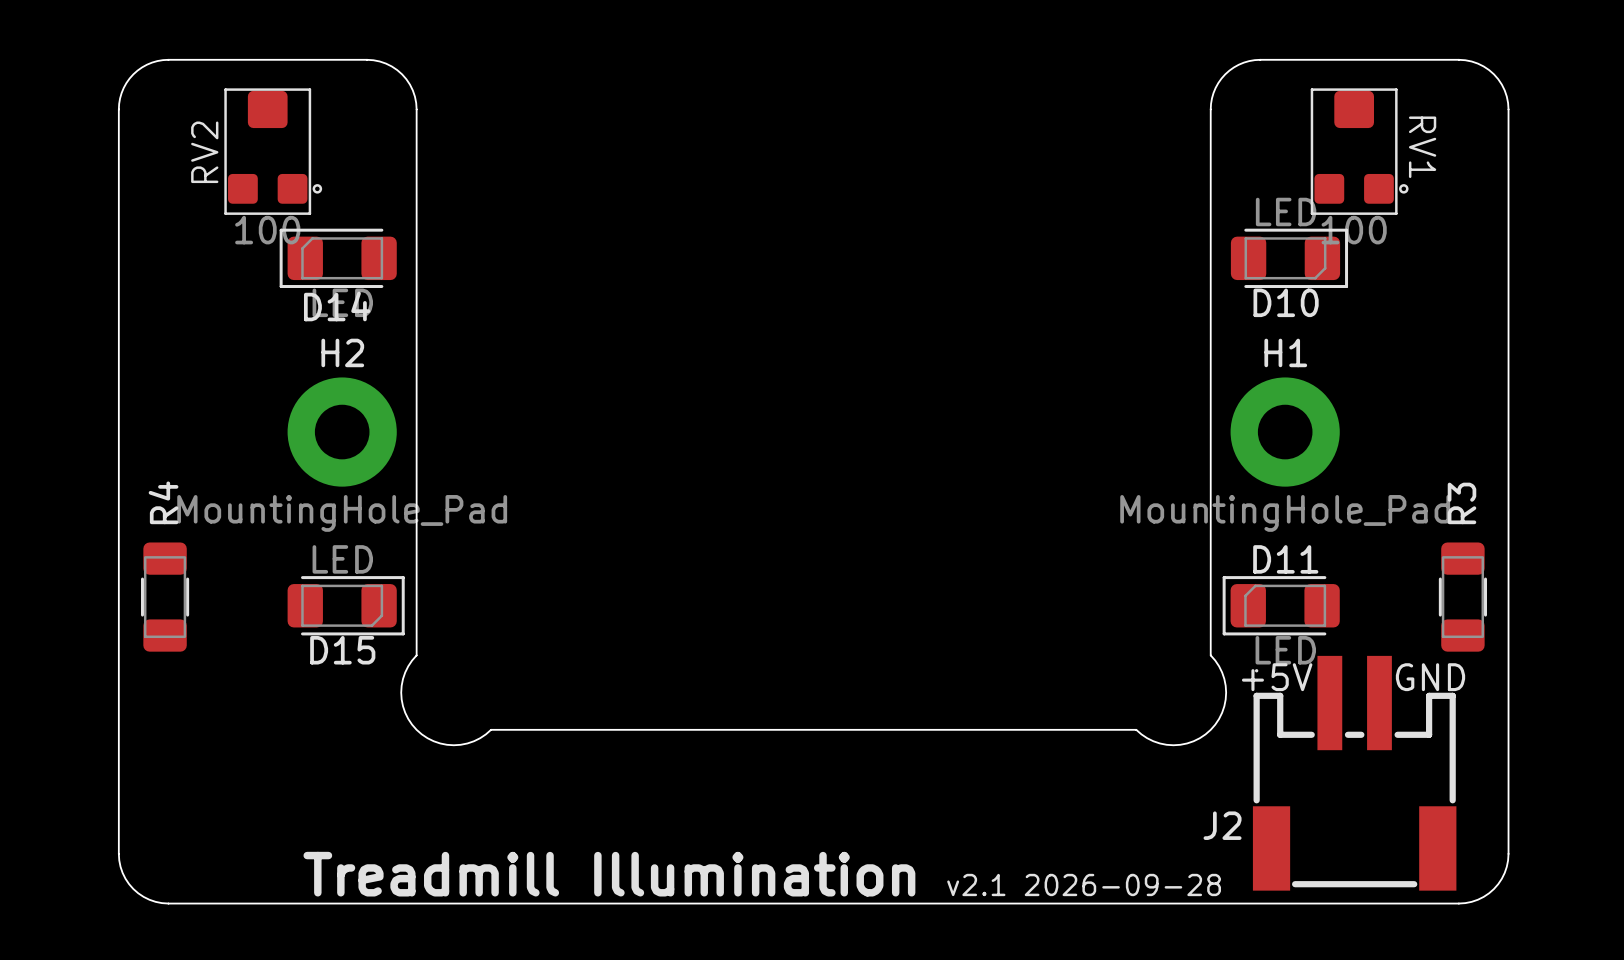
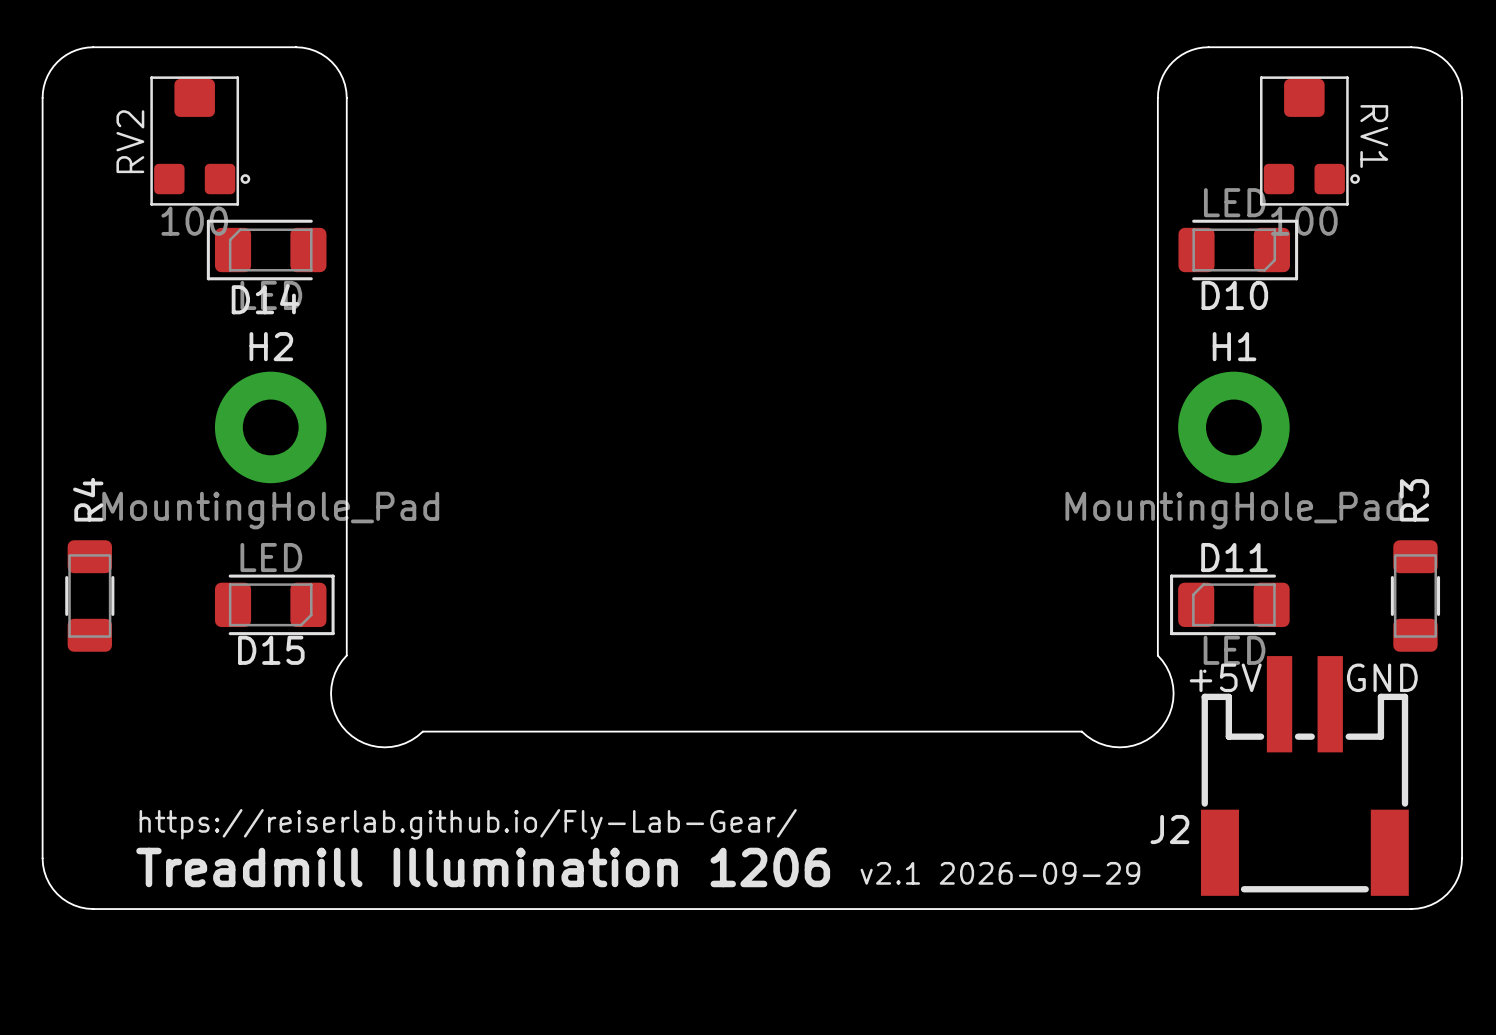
text: none -> https://reiserlab.github.io/Fly-Lab-Gear/ (468, 824)
text: Treadmill Illumination (609, 874) -> Treadmill Illumination 1206 (483, 867)
text: v2.1 2026-09-28 (1084, 884) -> v2.1 2026-09-29 (1000, 873)

